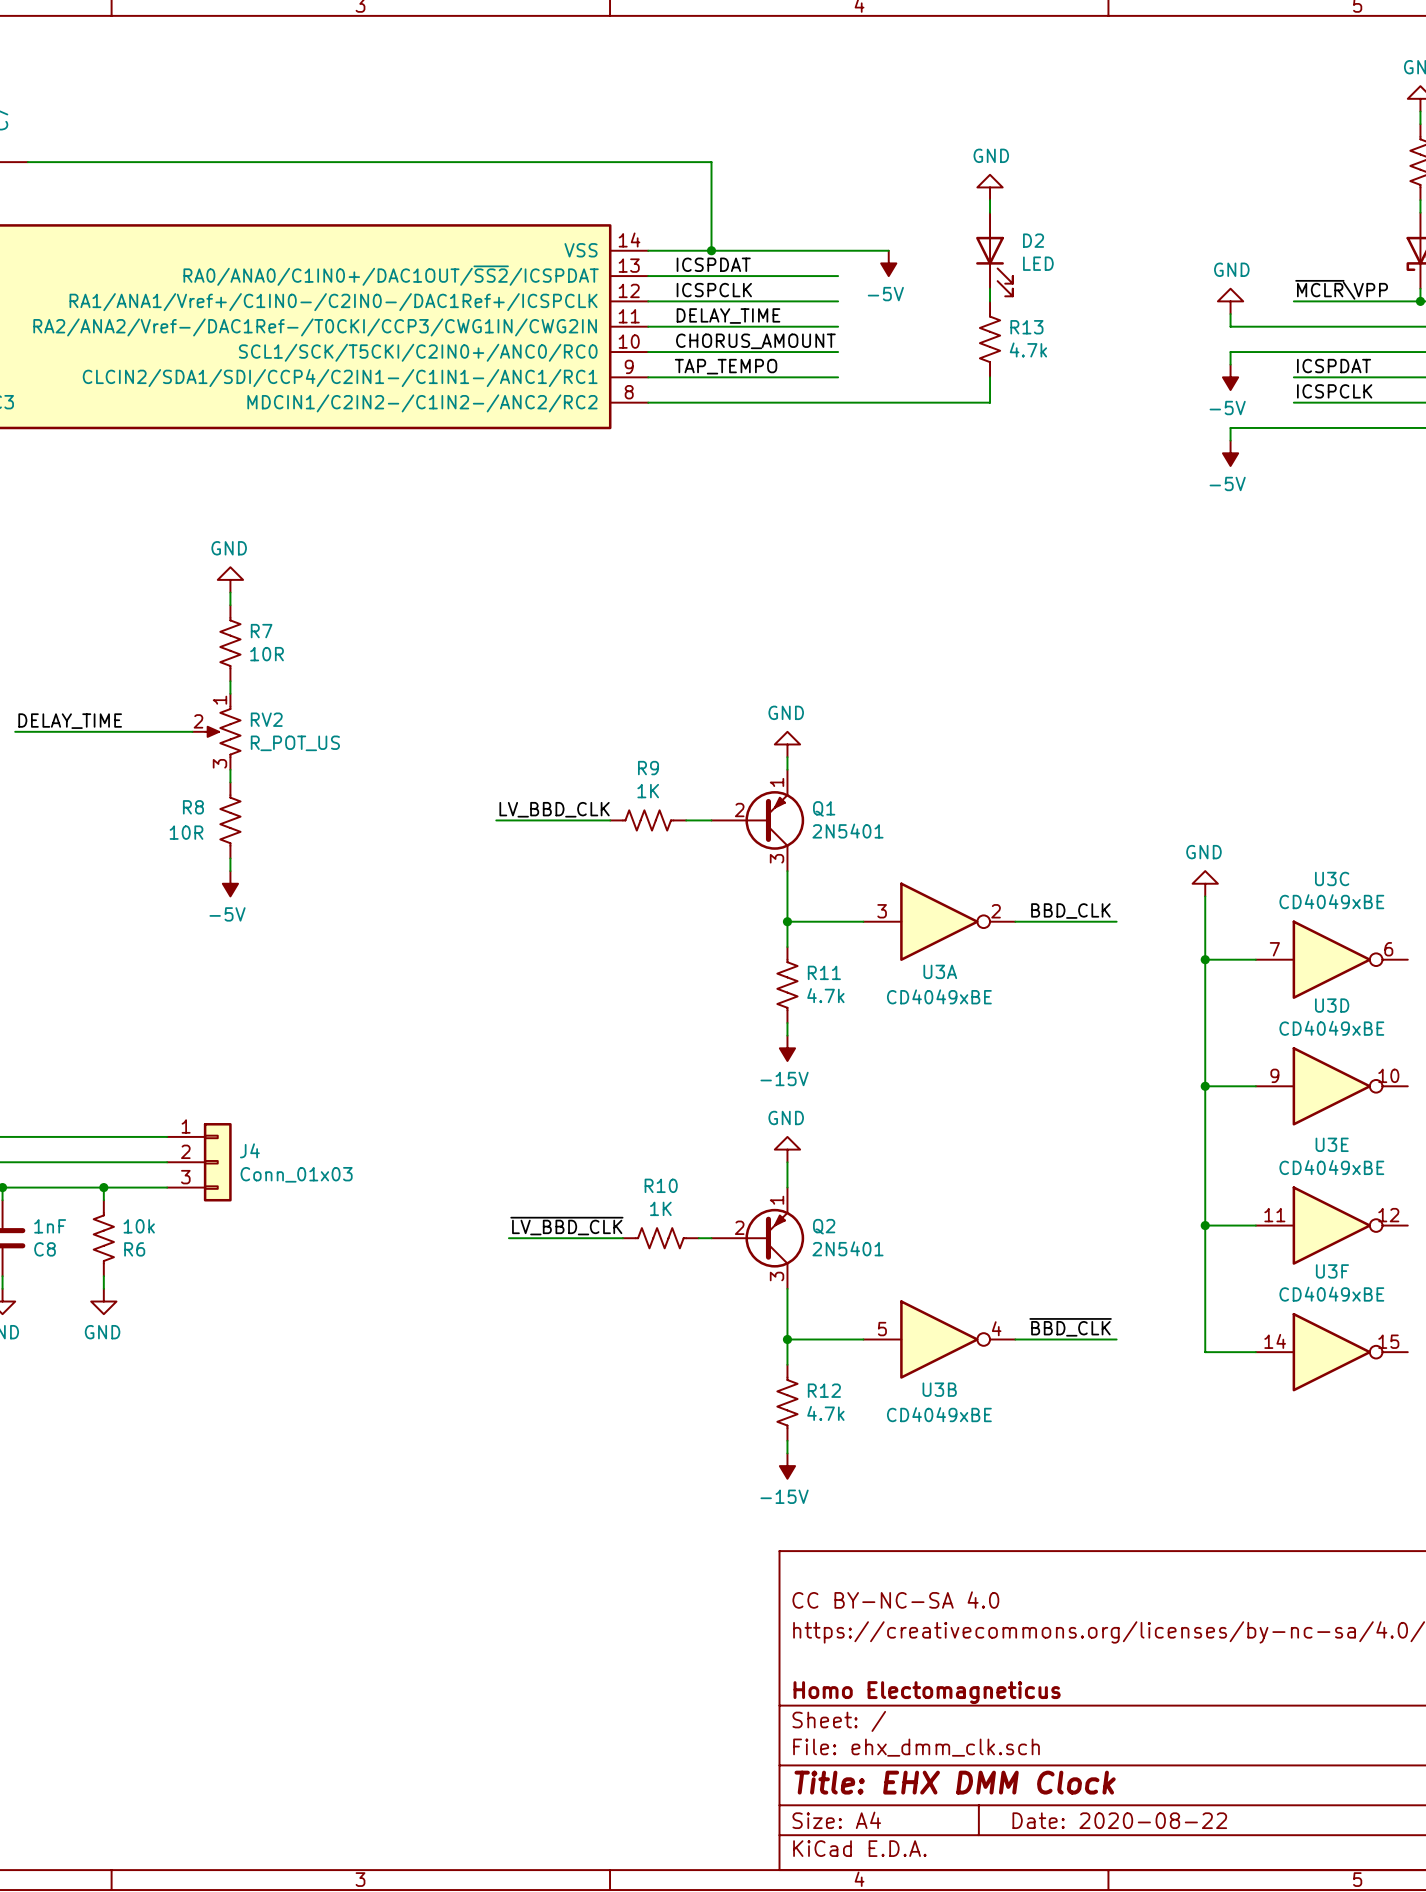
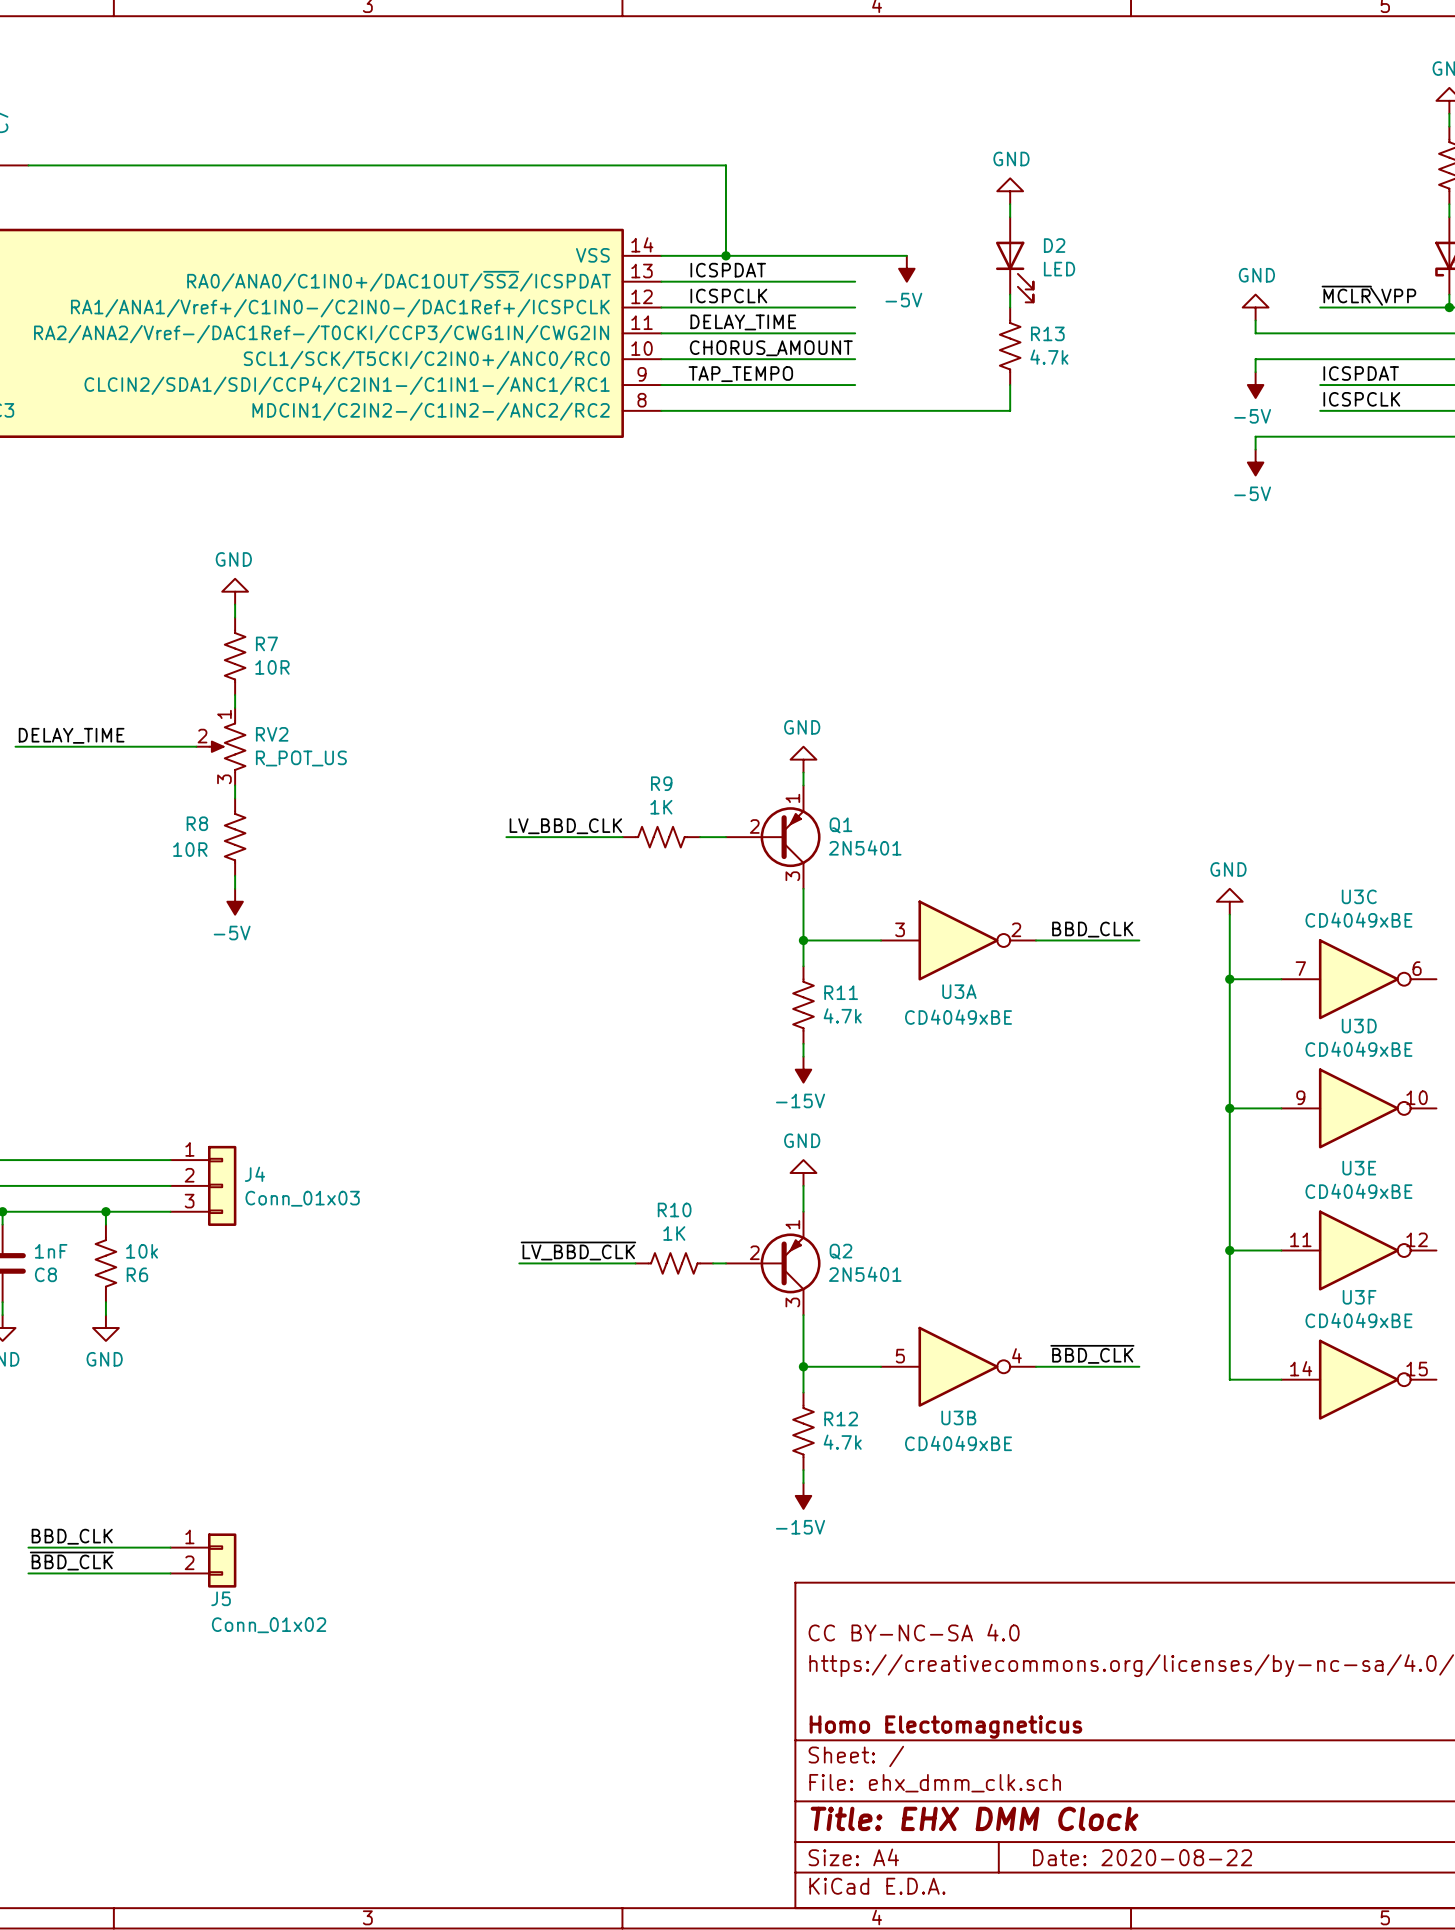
label: none -> BBD_CLK (72, 1536)
wire: none -> (28, 1547) (170, 1547)
label: none -> ~{BBD_CLK} (71, 1561)
J5: none -> Conn_01x02 (203, 1560)
wire: none -> (28, 1573) (170, 1573)

